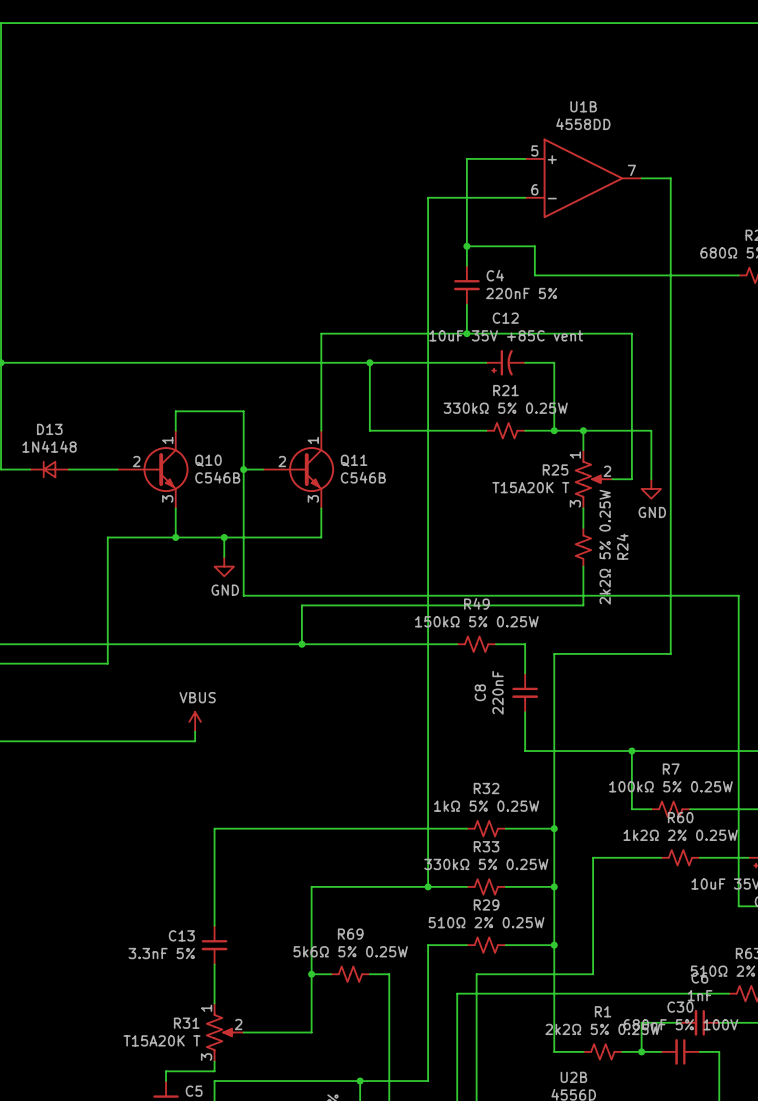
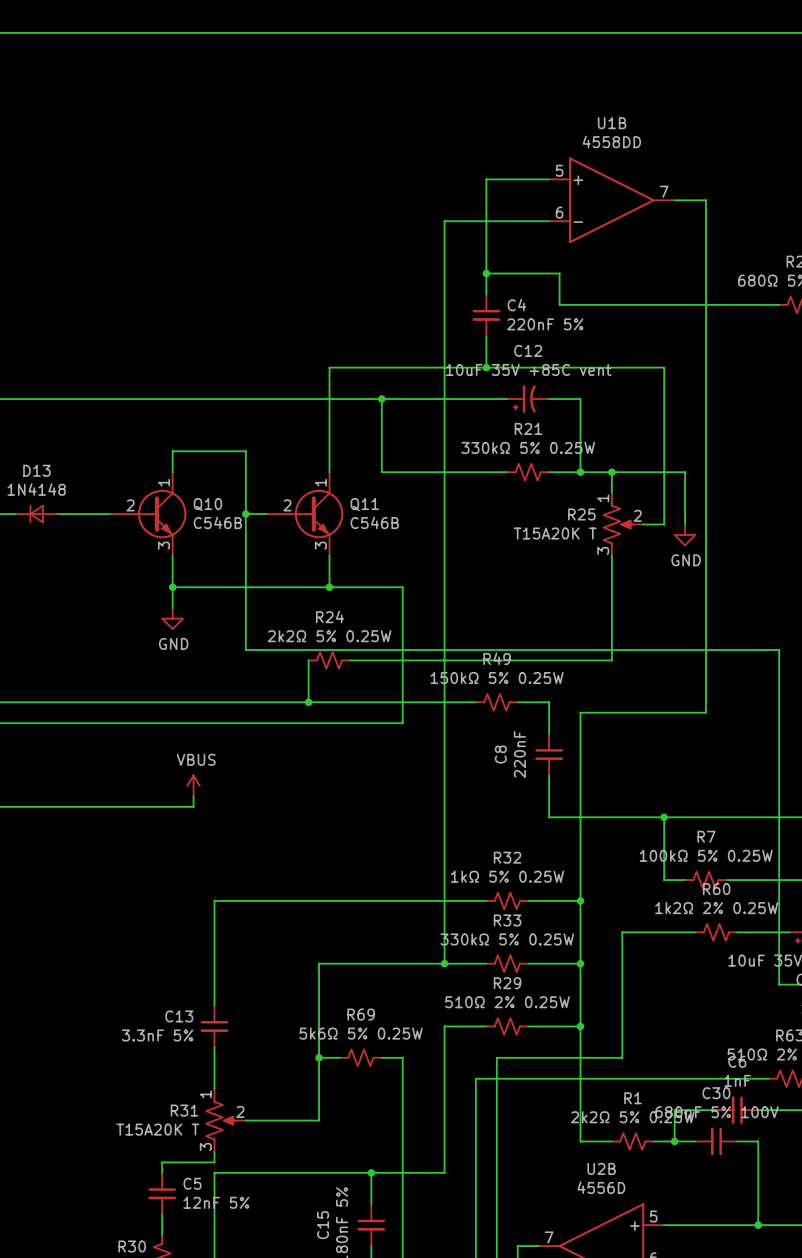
wire: (175, 537) (107, 537) (107, 663) -> (172, 587) (172, 608)
wire: (224, 537) (224, 556) -> none
junction: (224, 537) -> none
wire: none -> (329, 587) (402, 587) (402, 723) (99, 723)
junction: none -> (329, 587)
R24 name position: R24 (622, 546) -> R24 (330, 616)
R24 rotation: 0° (583, 547) -> 90° clockwise (329, 660)
R24 position: (583, 547) -> (329, 660)
R24 value position: 2k2Ω 5% 0.25W (605, 547) -> 2k2Ω 5% 0.25W (329, 636)
power symbol position: GND (224, 566) -> GND (172, 618)

